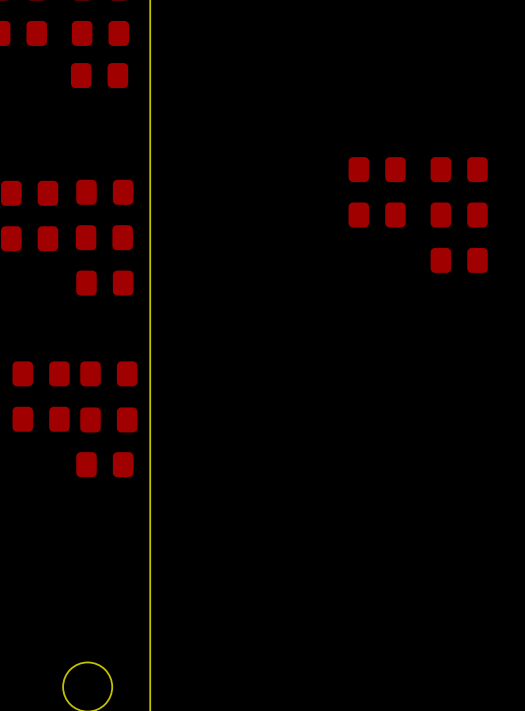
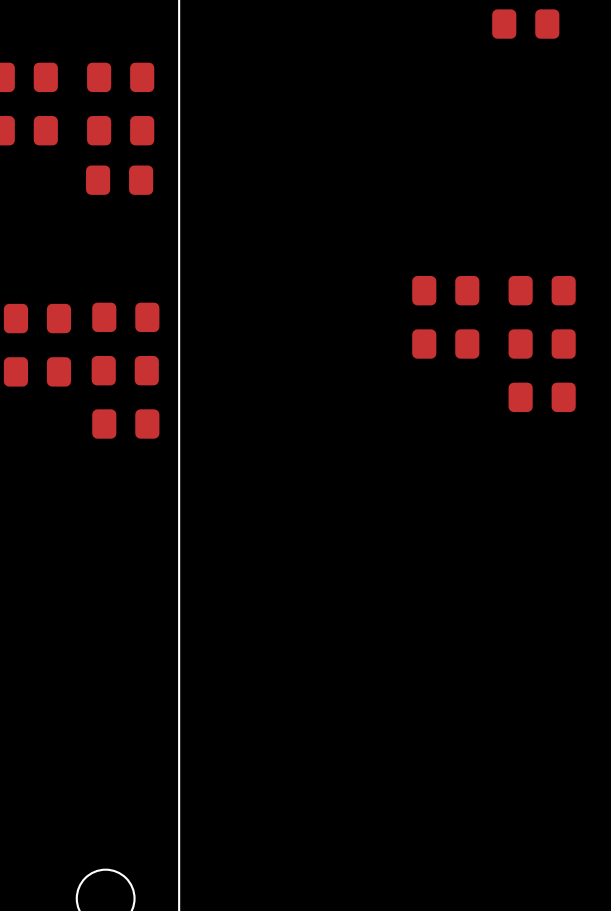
part: (41, 373) -> none
part: (108, 373) -> none
part: (41, 419) -> none
part: (108, 419) -> none
part: (104, 464) -> none

